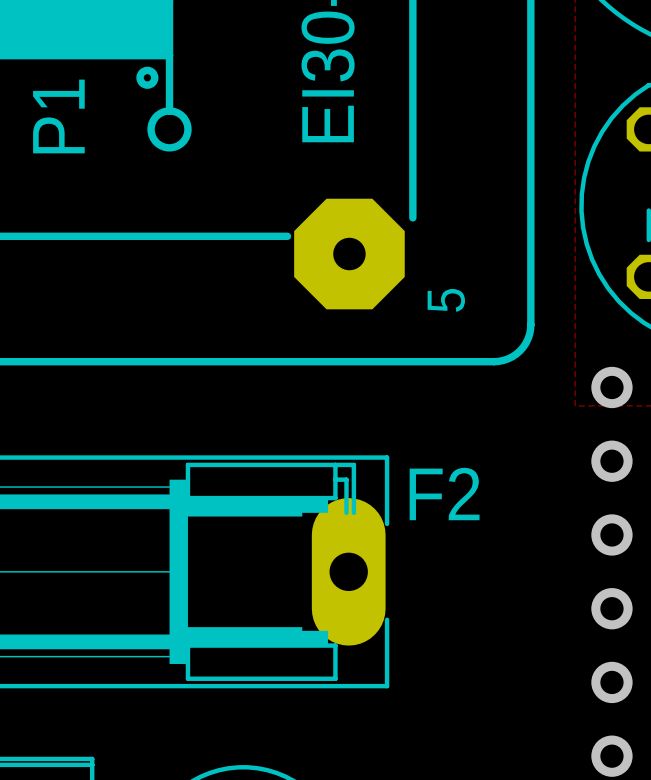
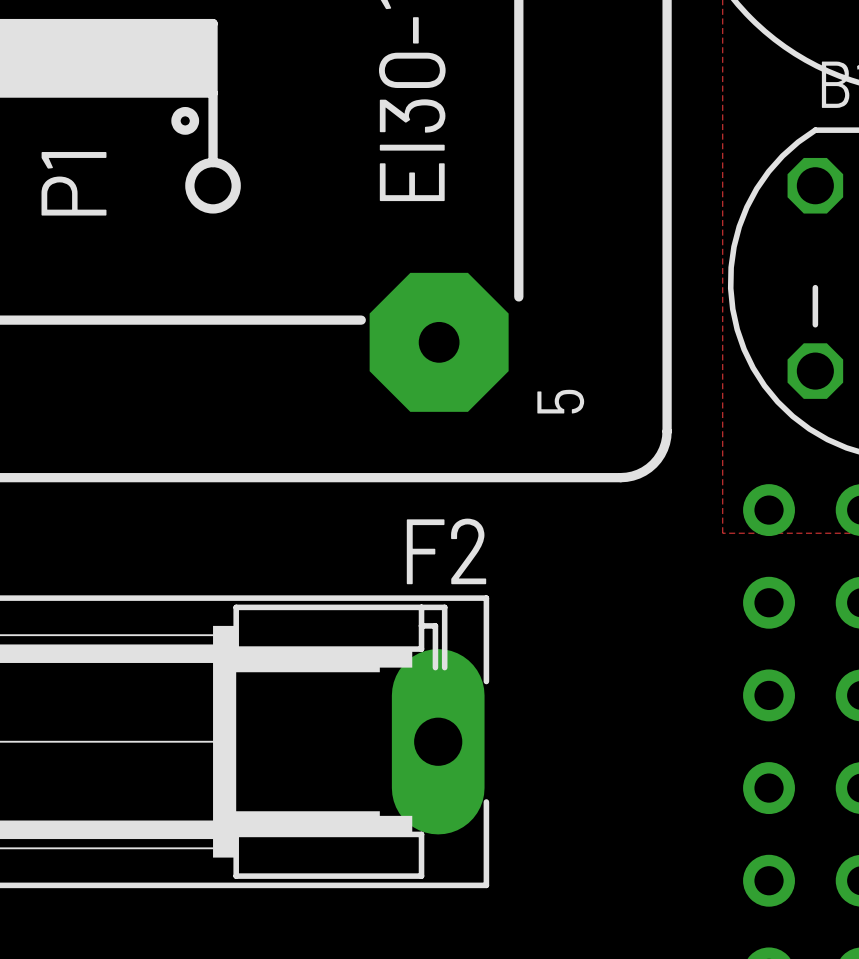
F2 name position: F2 (444, 494) -> F2 (446, 551)

